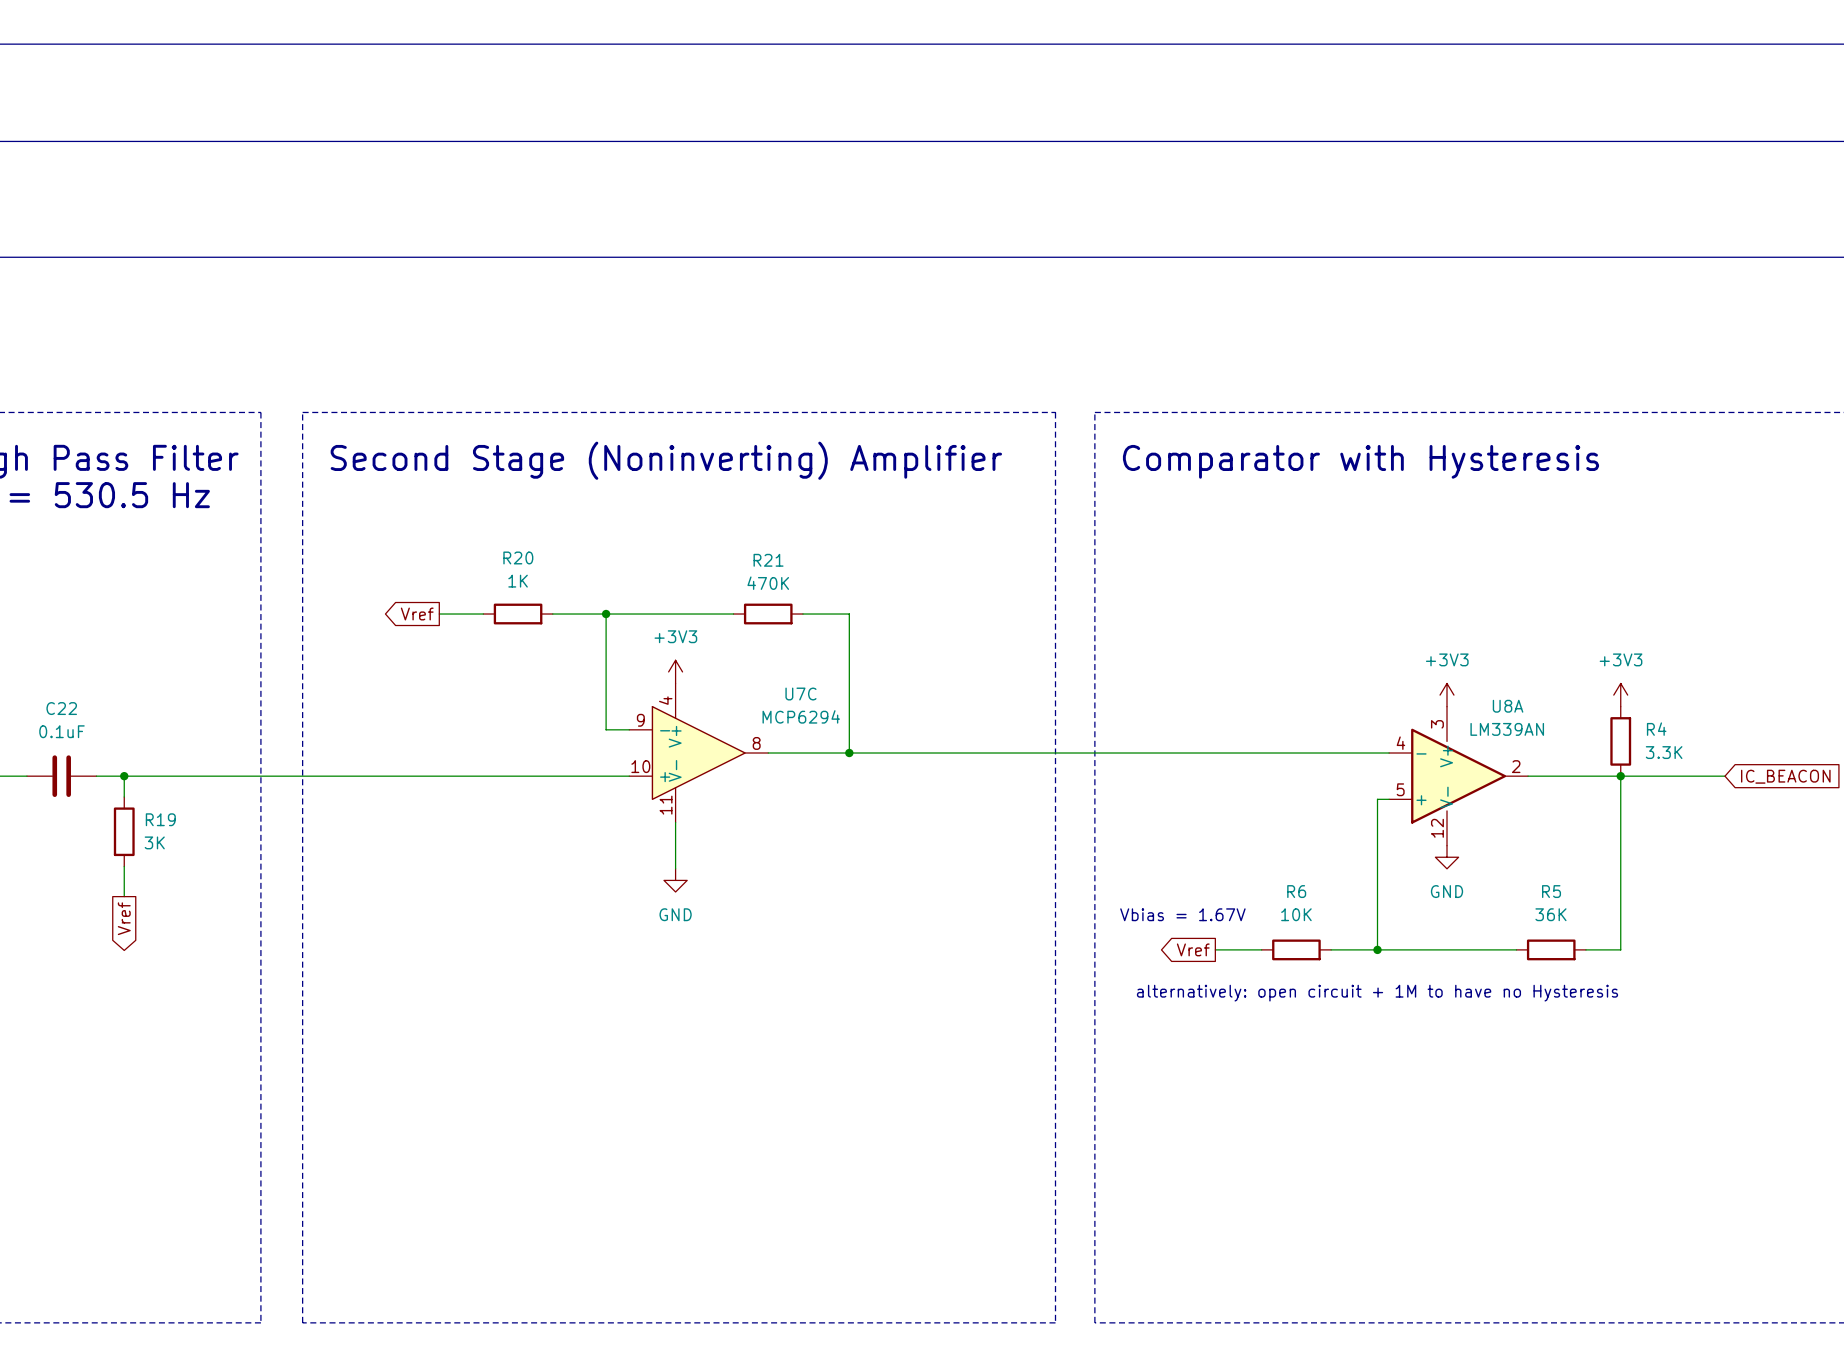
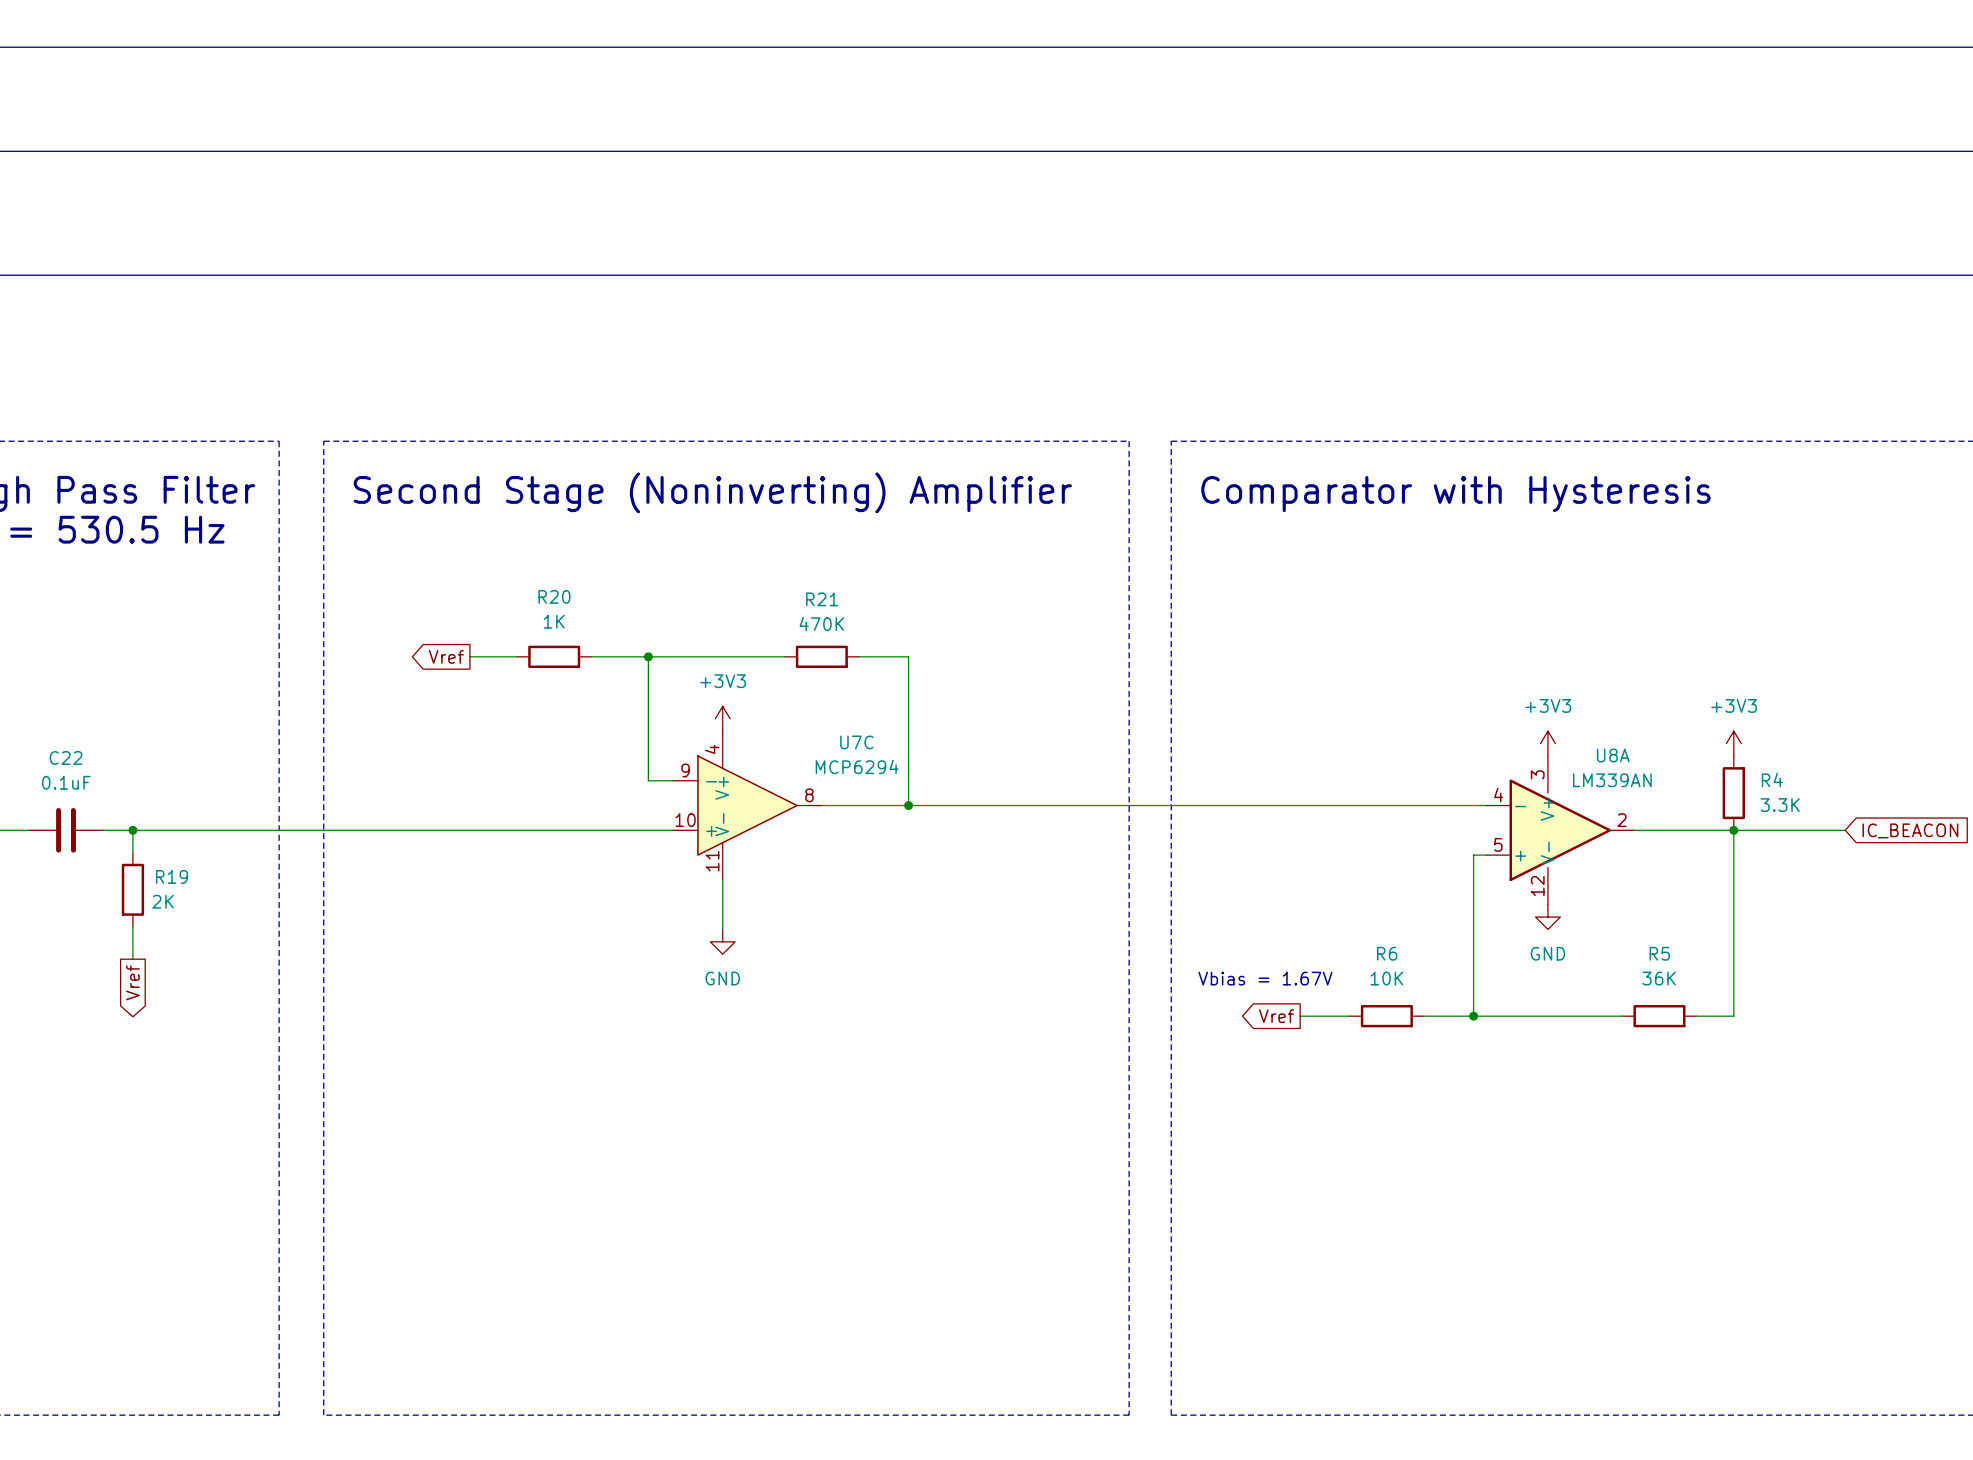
R19 value: 3K (154, 842) -> 2K (163, 901)
text: alternatively: open circuit + 1M to have no Hysteresis (1377, 993) -> none

